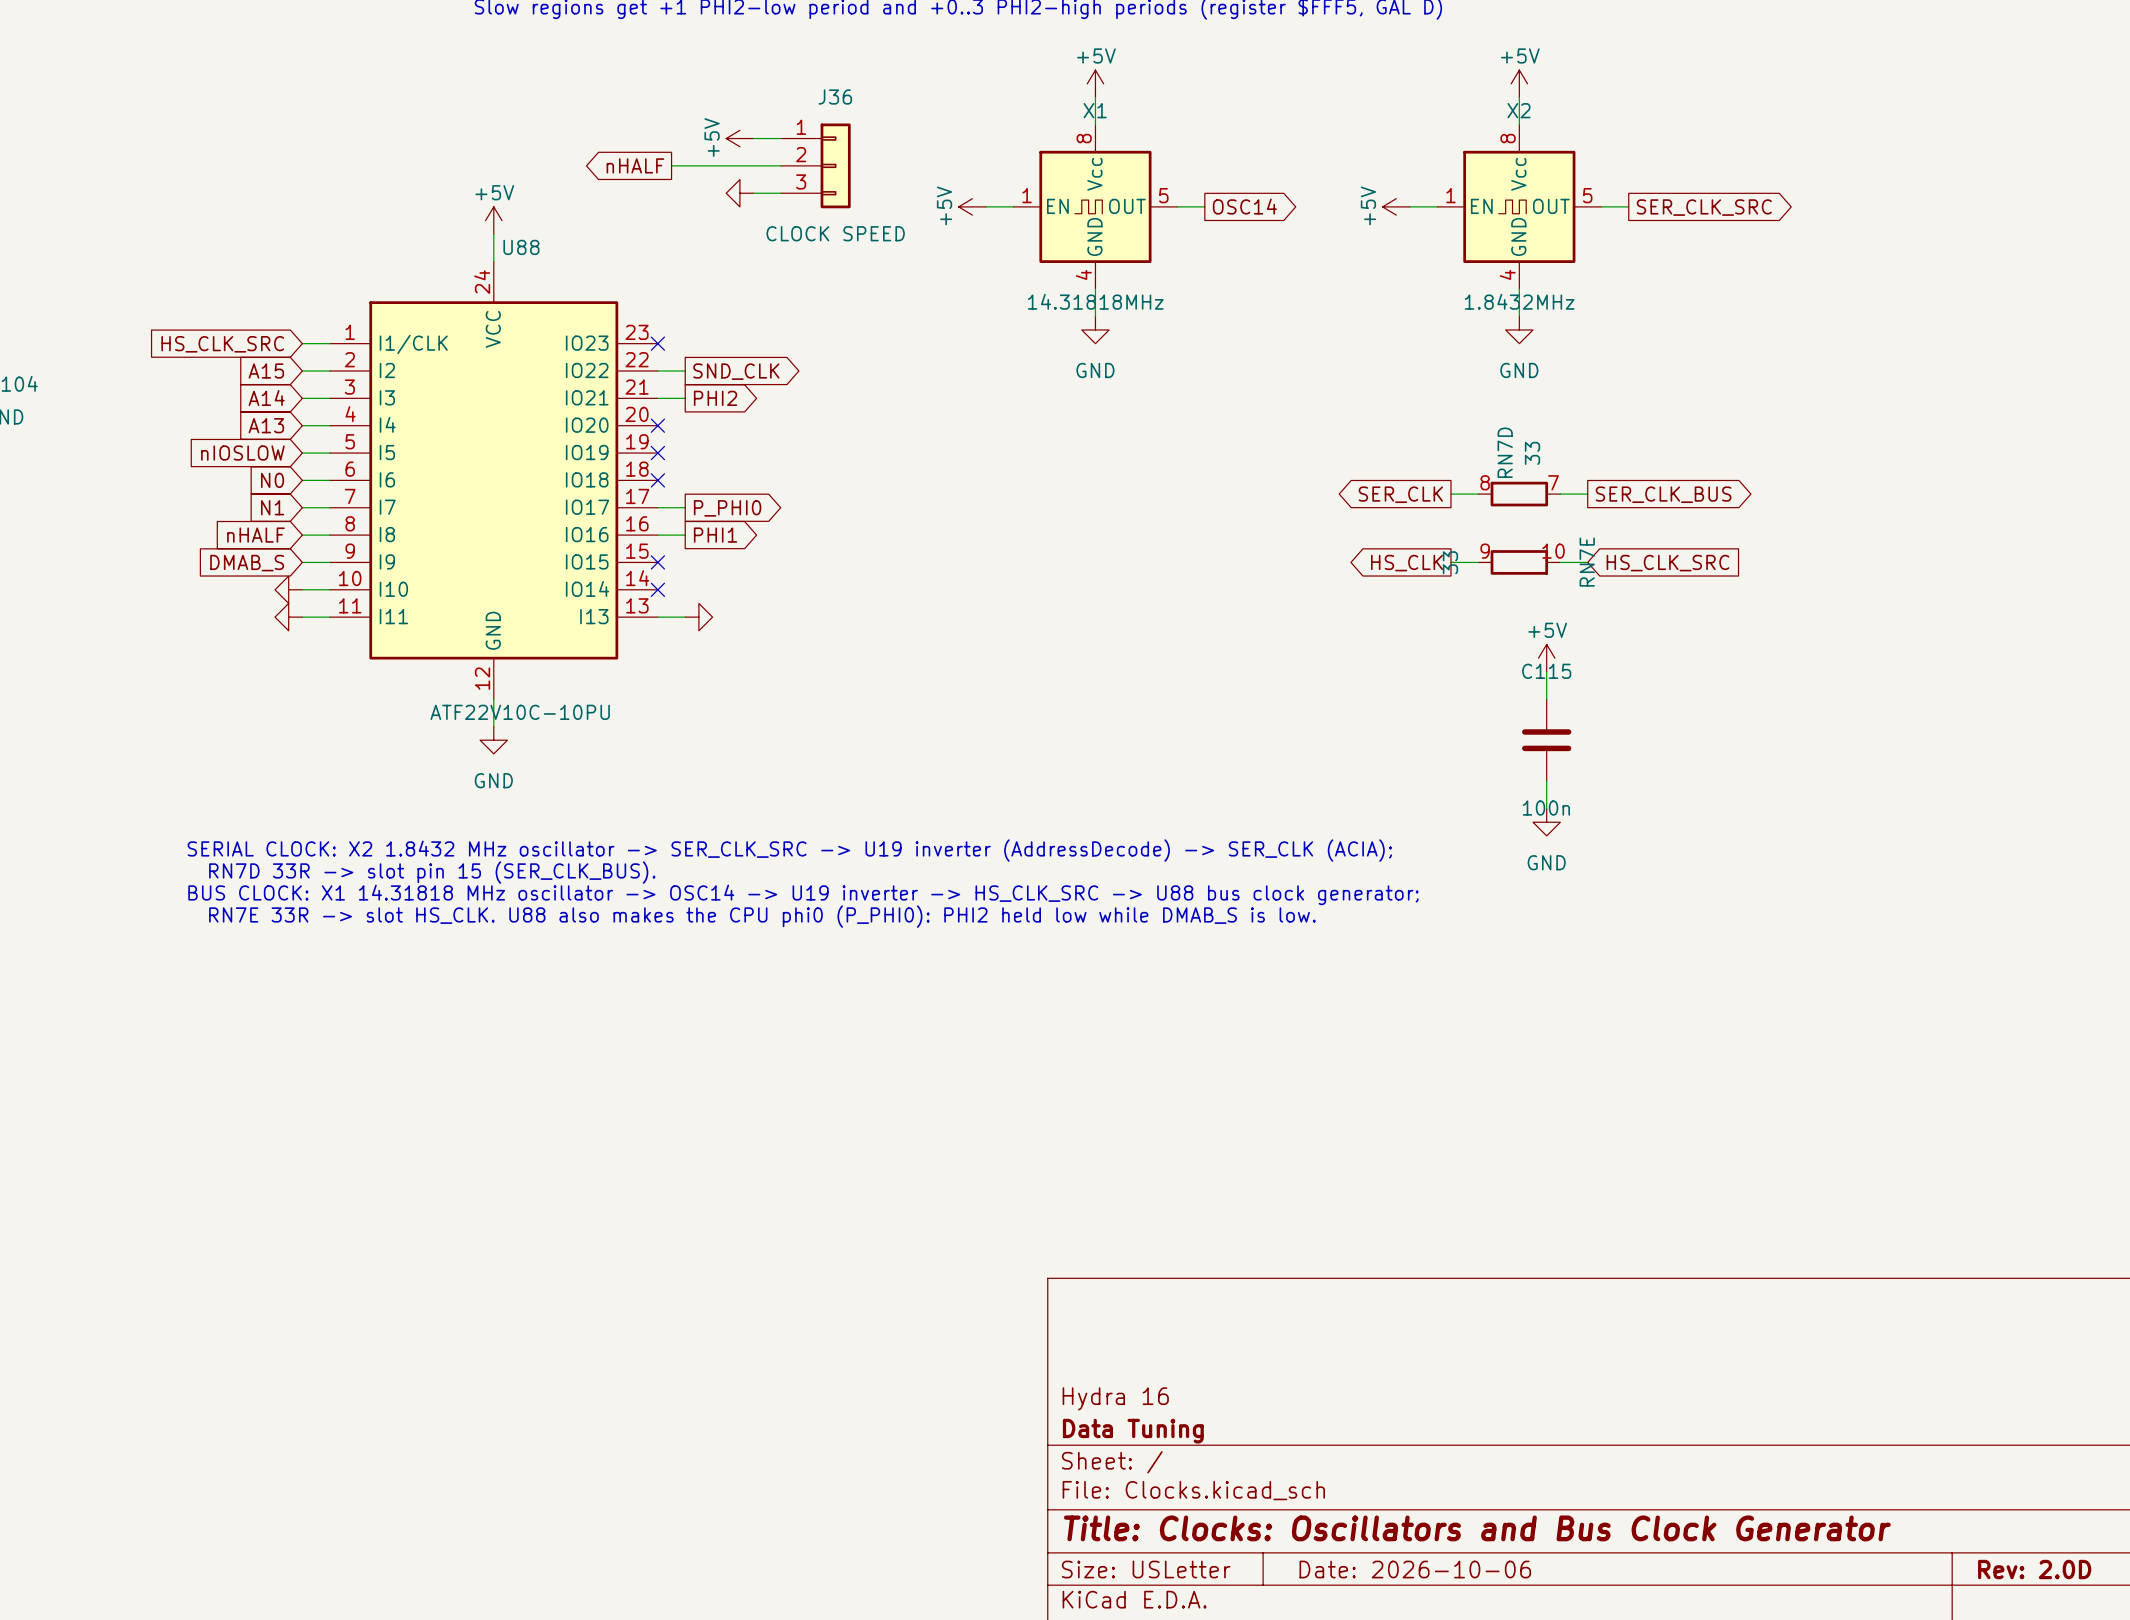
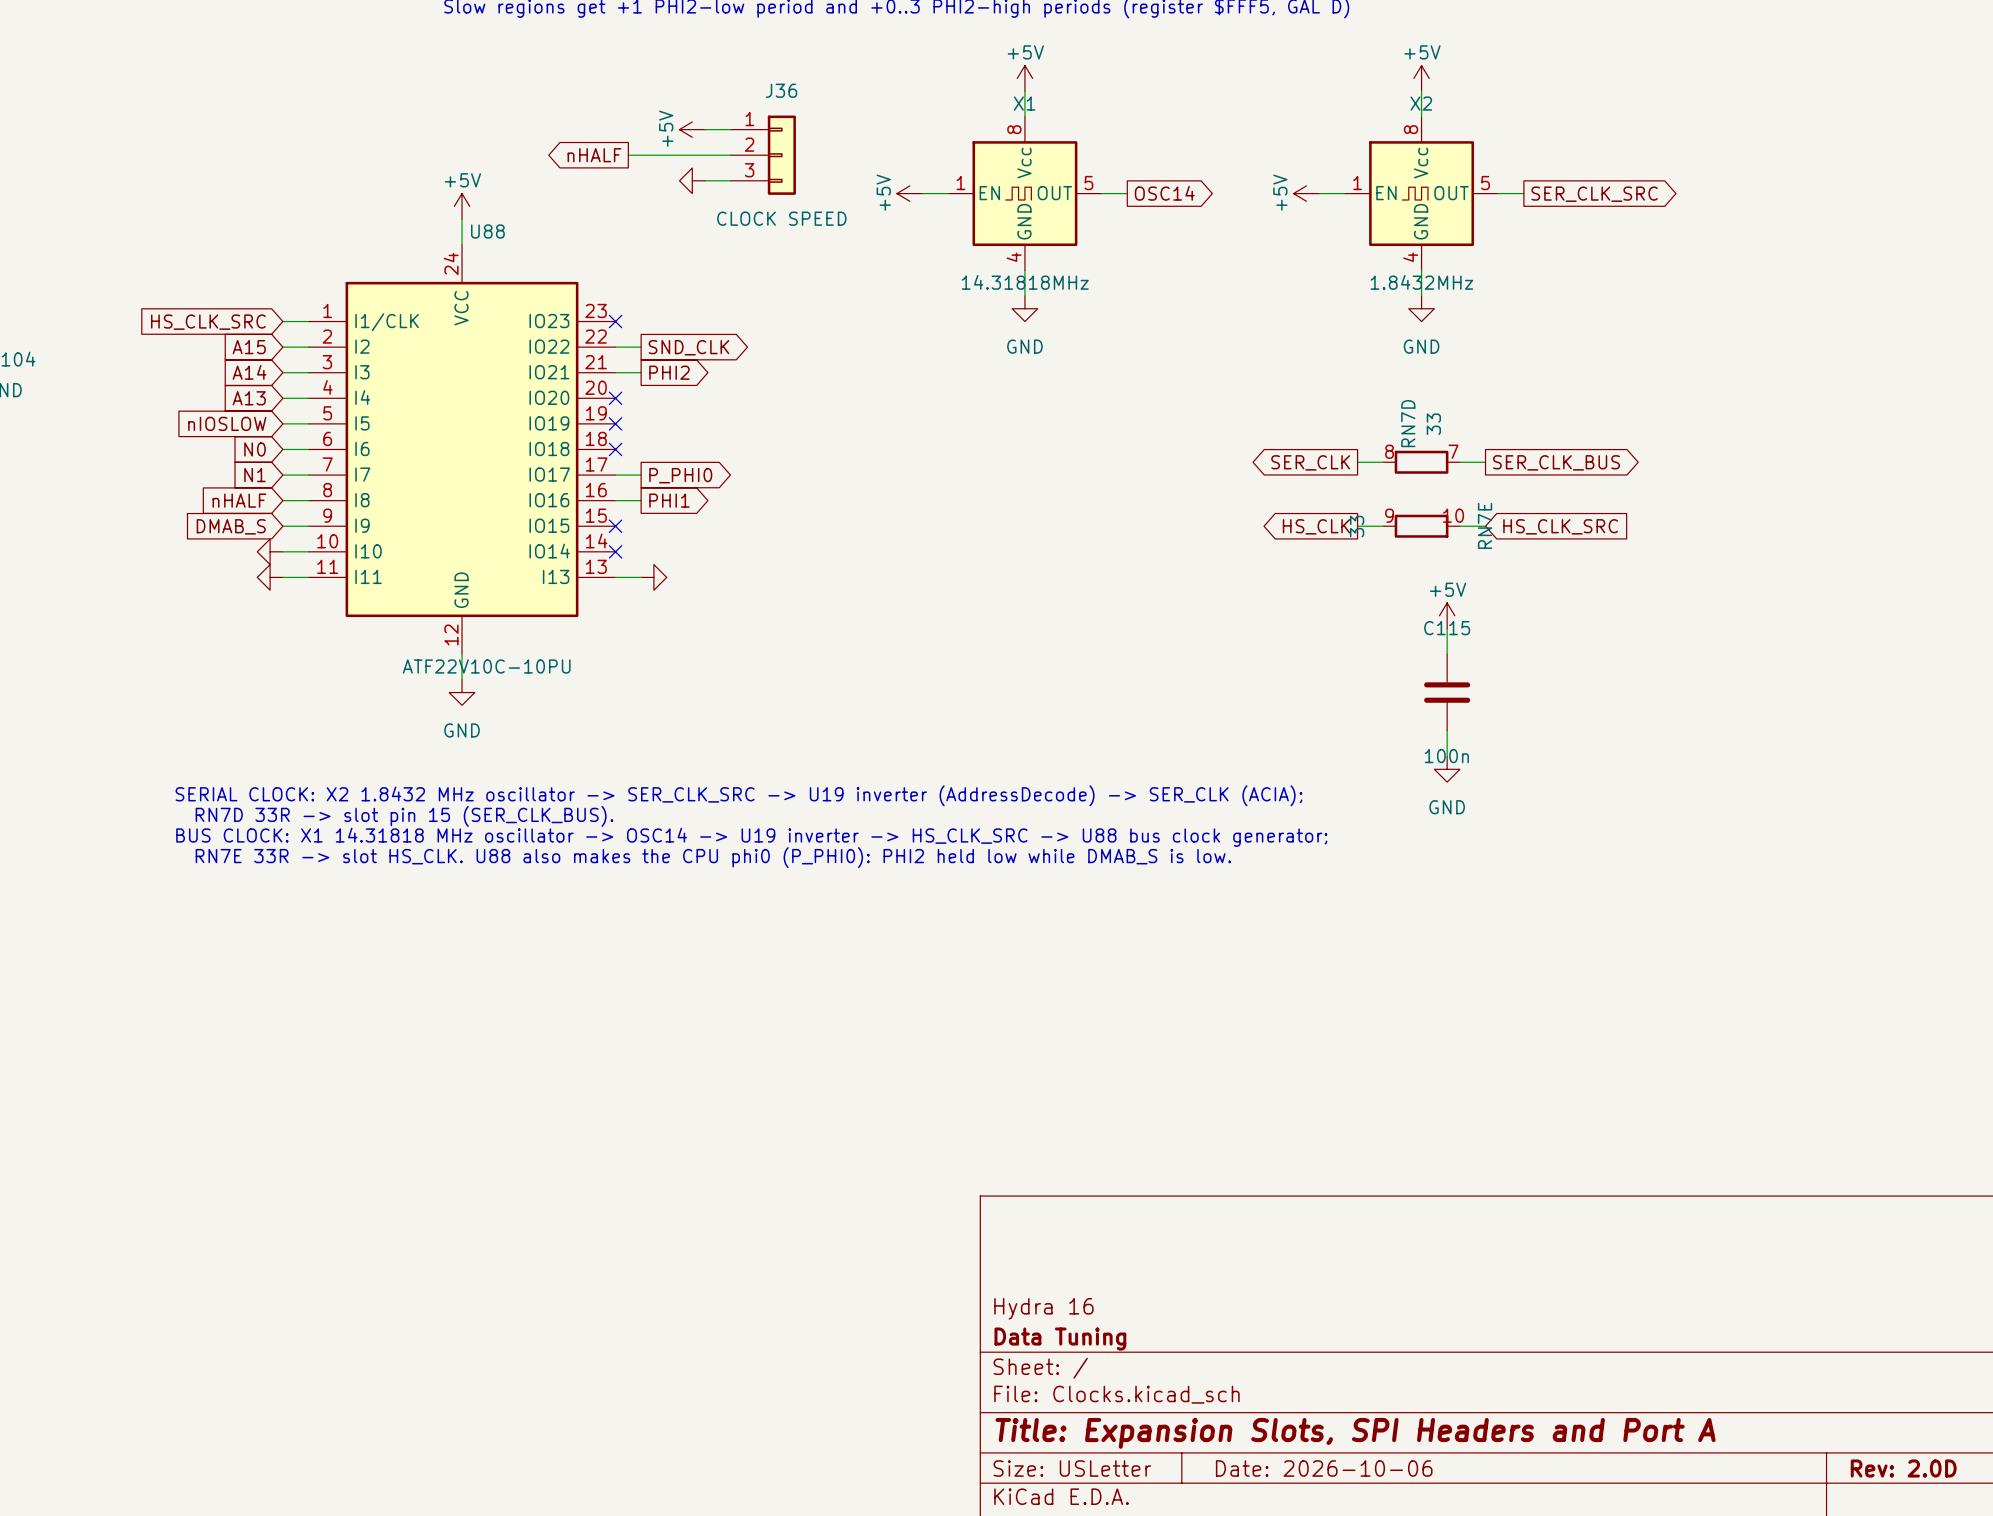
title block: Title: Clocks: Oscillators and Bus Clock Generator (1477, 1528) -> Title: Expansion Slots, SPI Headers and Port A (1355, 1433)

